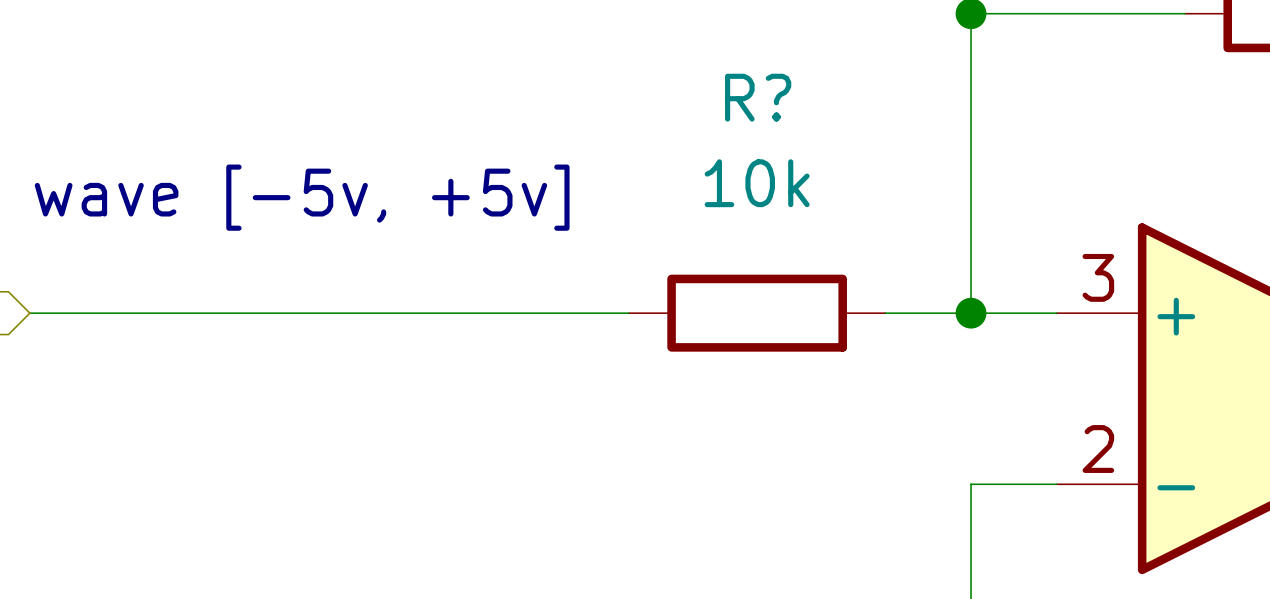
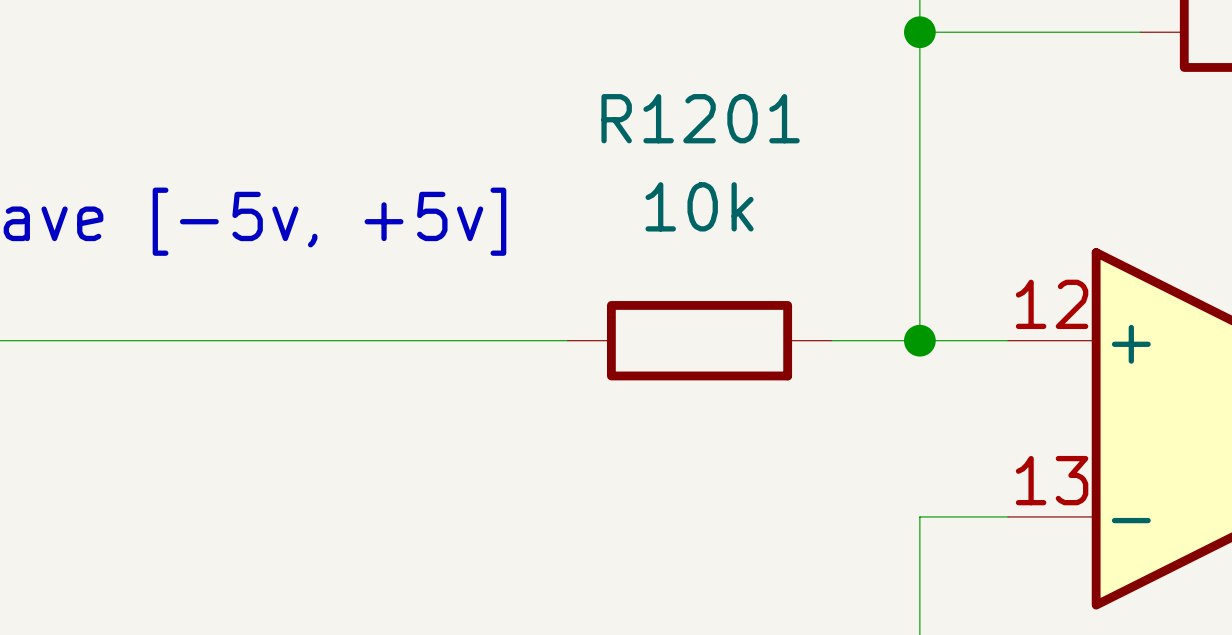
R? name: R? (758, 97) -> R1201 (700, 118)
part pin number: 3 (1098, 277) -> 12 (1052, 304)
part pin number: 2 (1098, 449) -> 13 (1052, 480)

